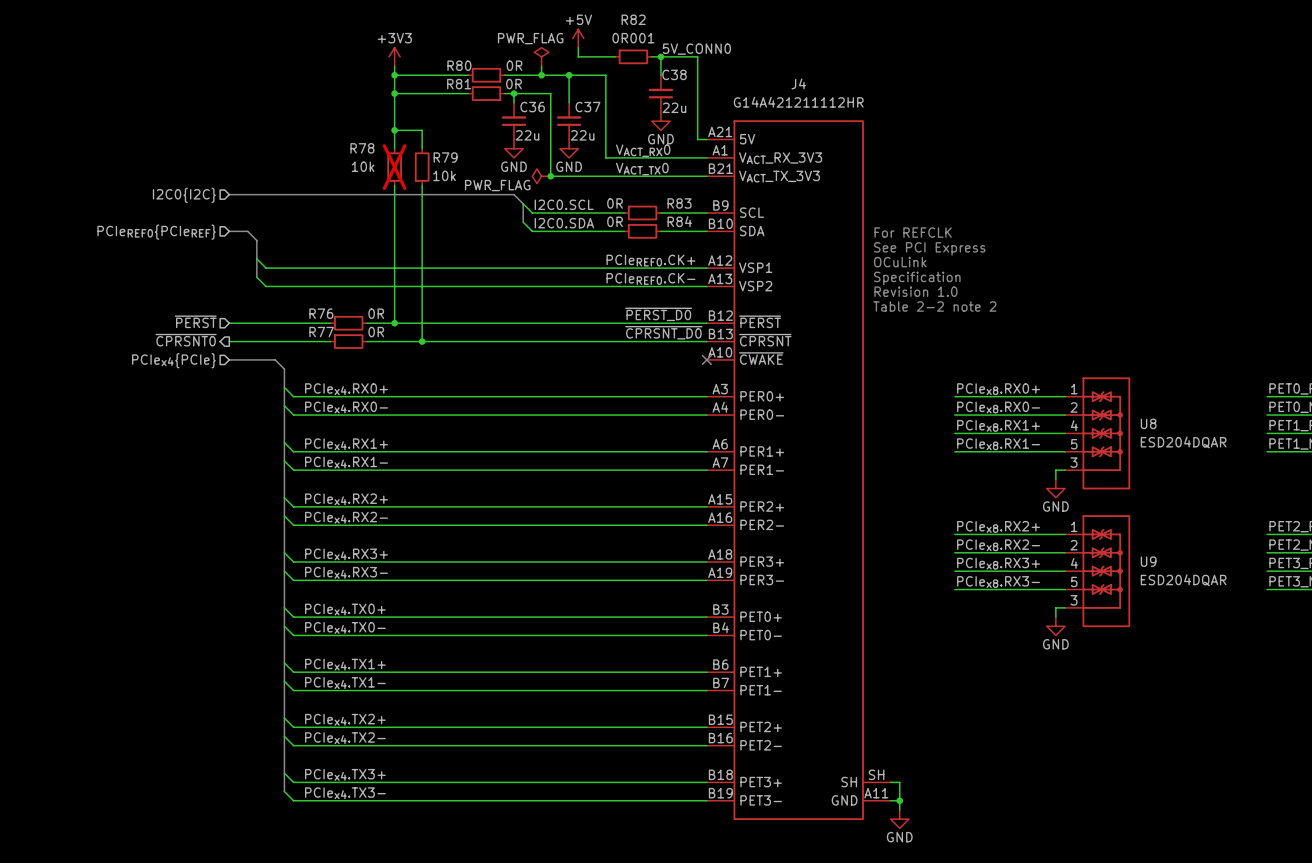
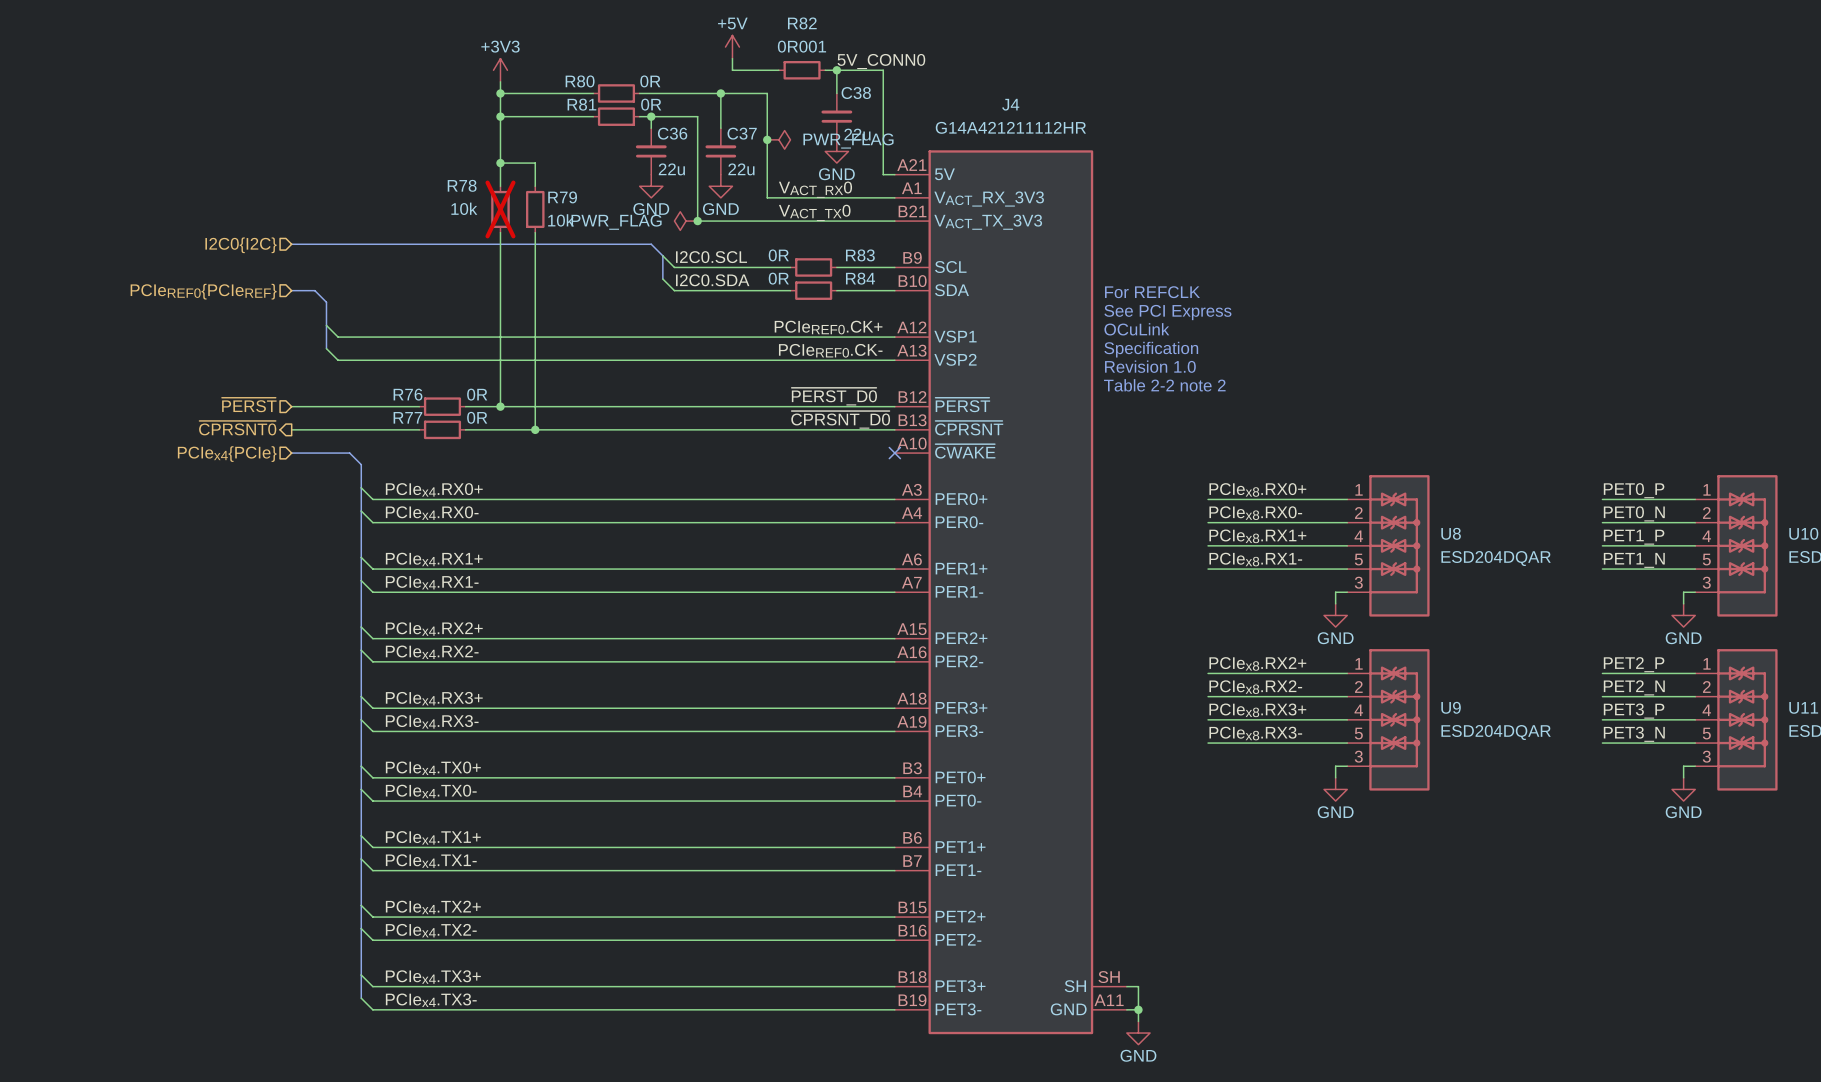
power symbol text position: PWR_FLAG (530, 38) -> PWR_FLAG (848, 141)
power symbol rotation: 0° (541, 56) -> 90° clockwise (778, 139)
power symbol position: PWR_FLAG (541, 56) -> PWR_FLAG (778, 139)
wire: (541, 66) (541, 75) -> none
junction: (541, 75) -> none
junction: none -> (767, 139)
power symbol text position: PWR_FLAG (497, 185) -> PWR_FLAG (616, 222)

